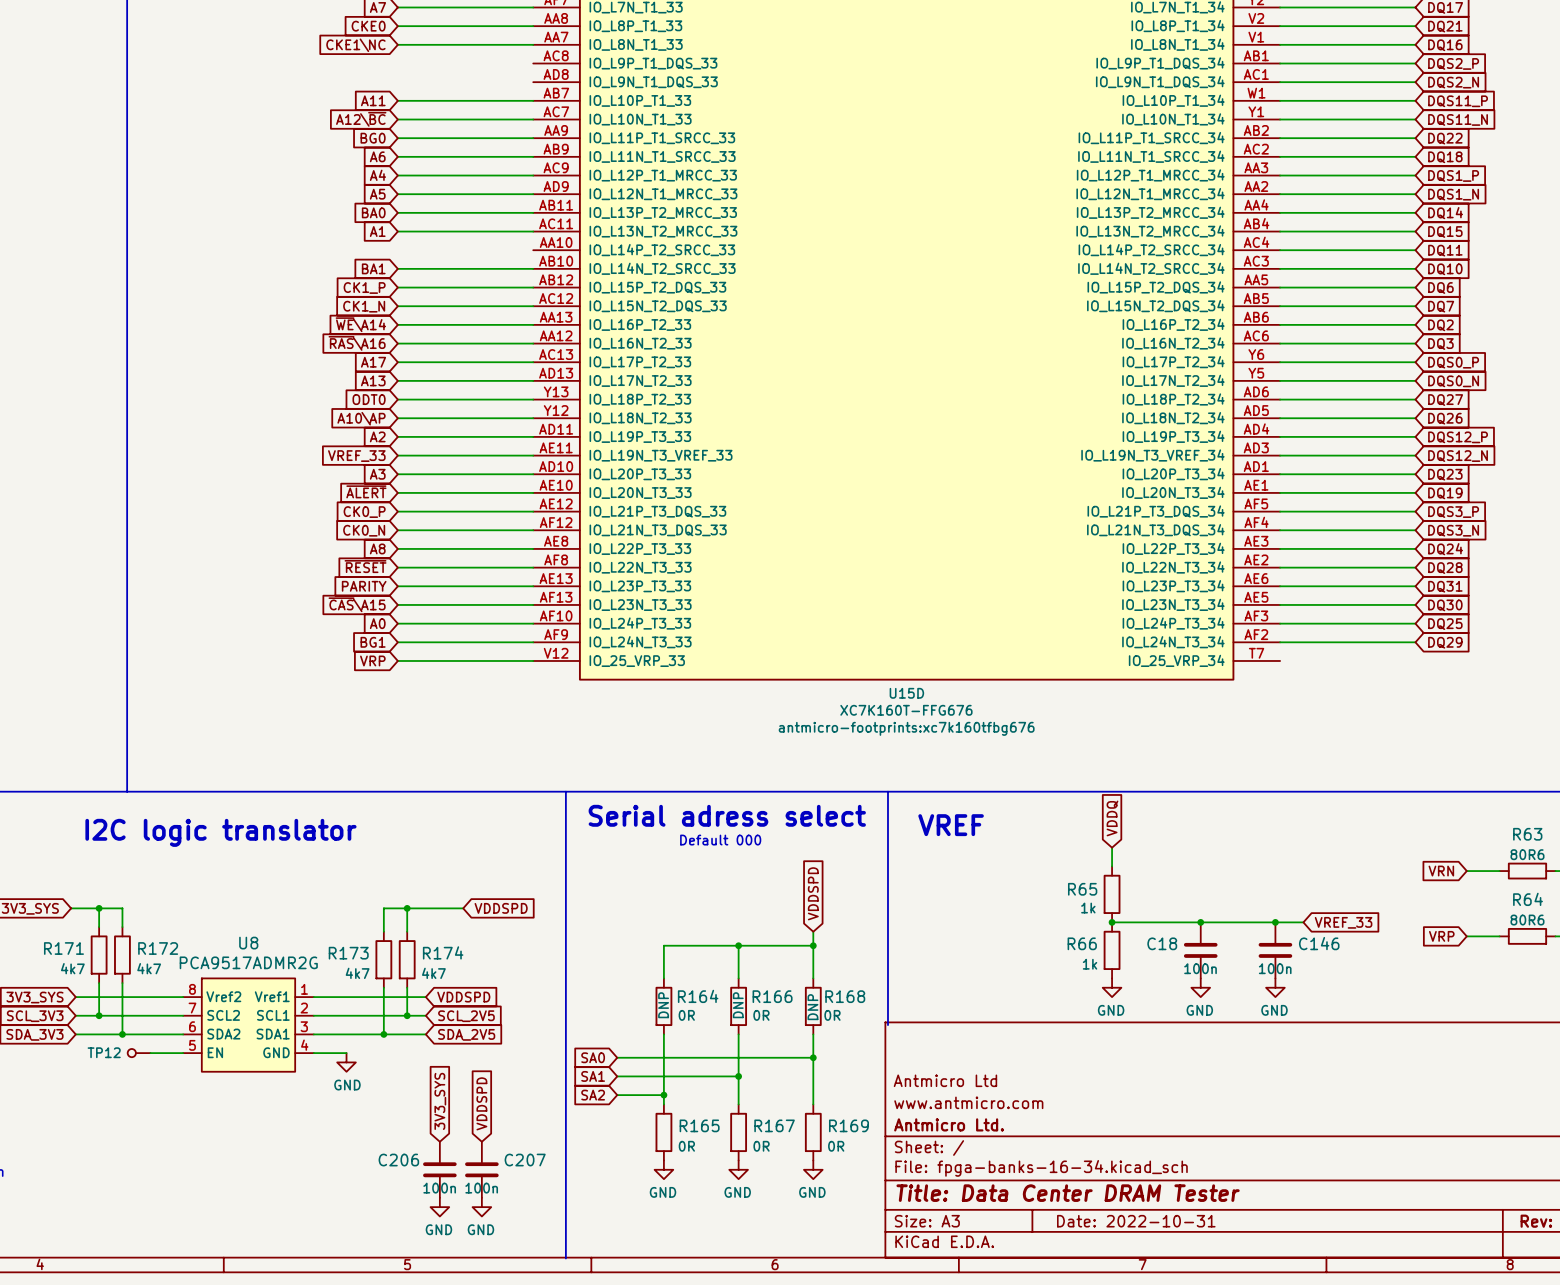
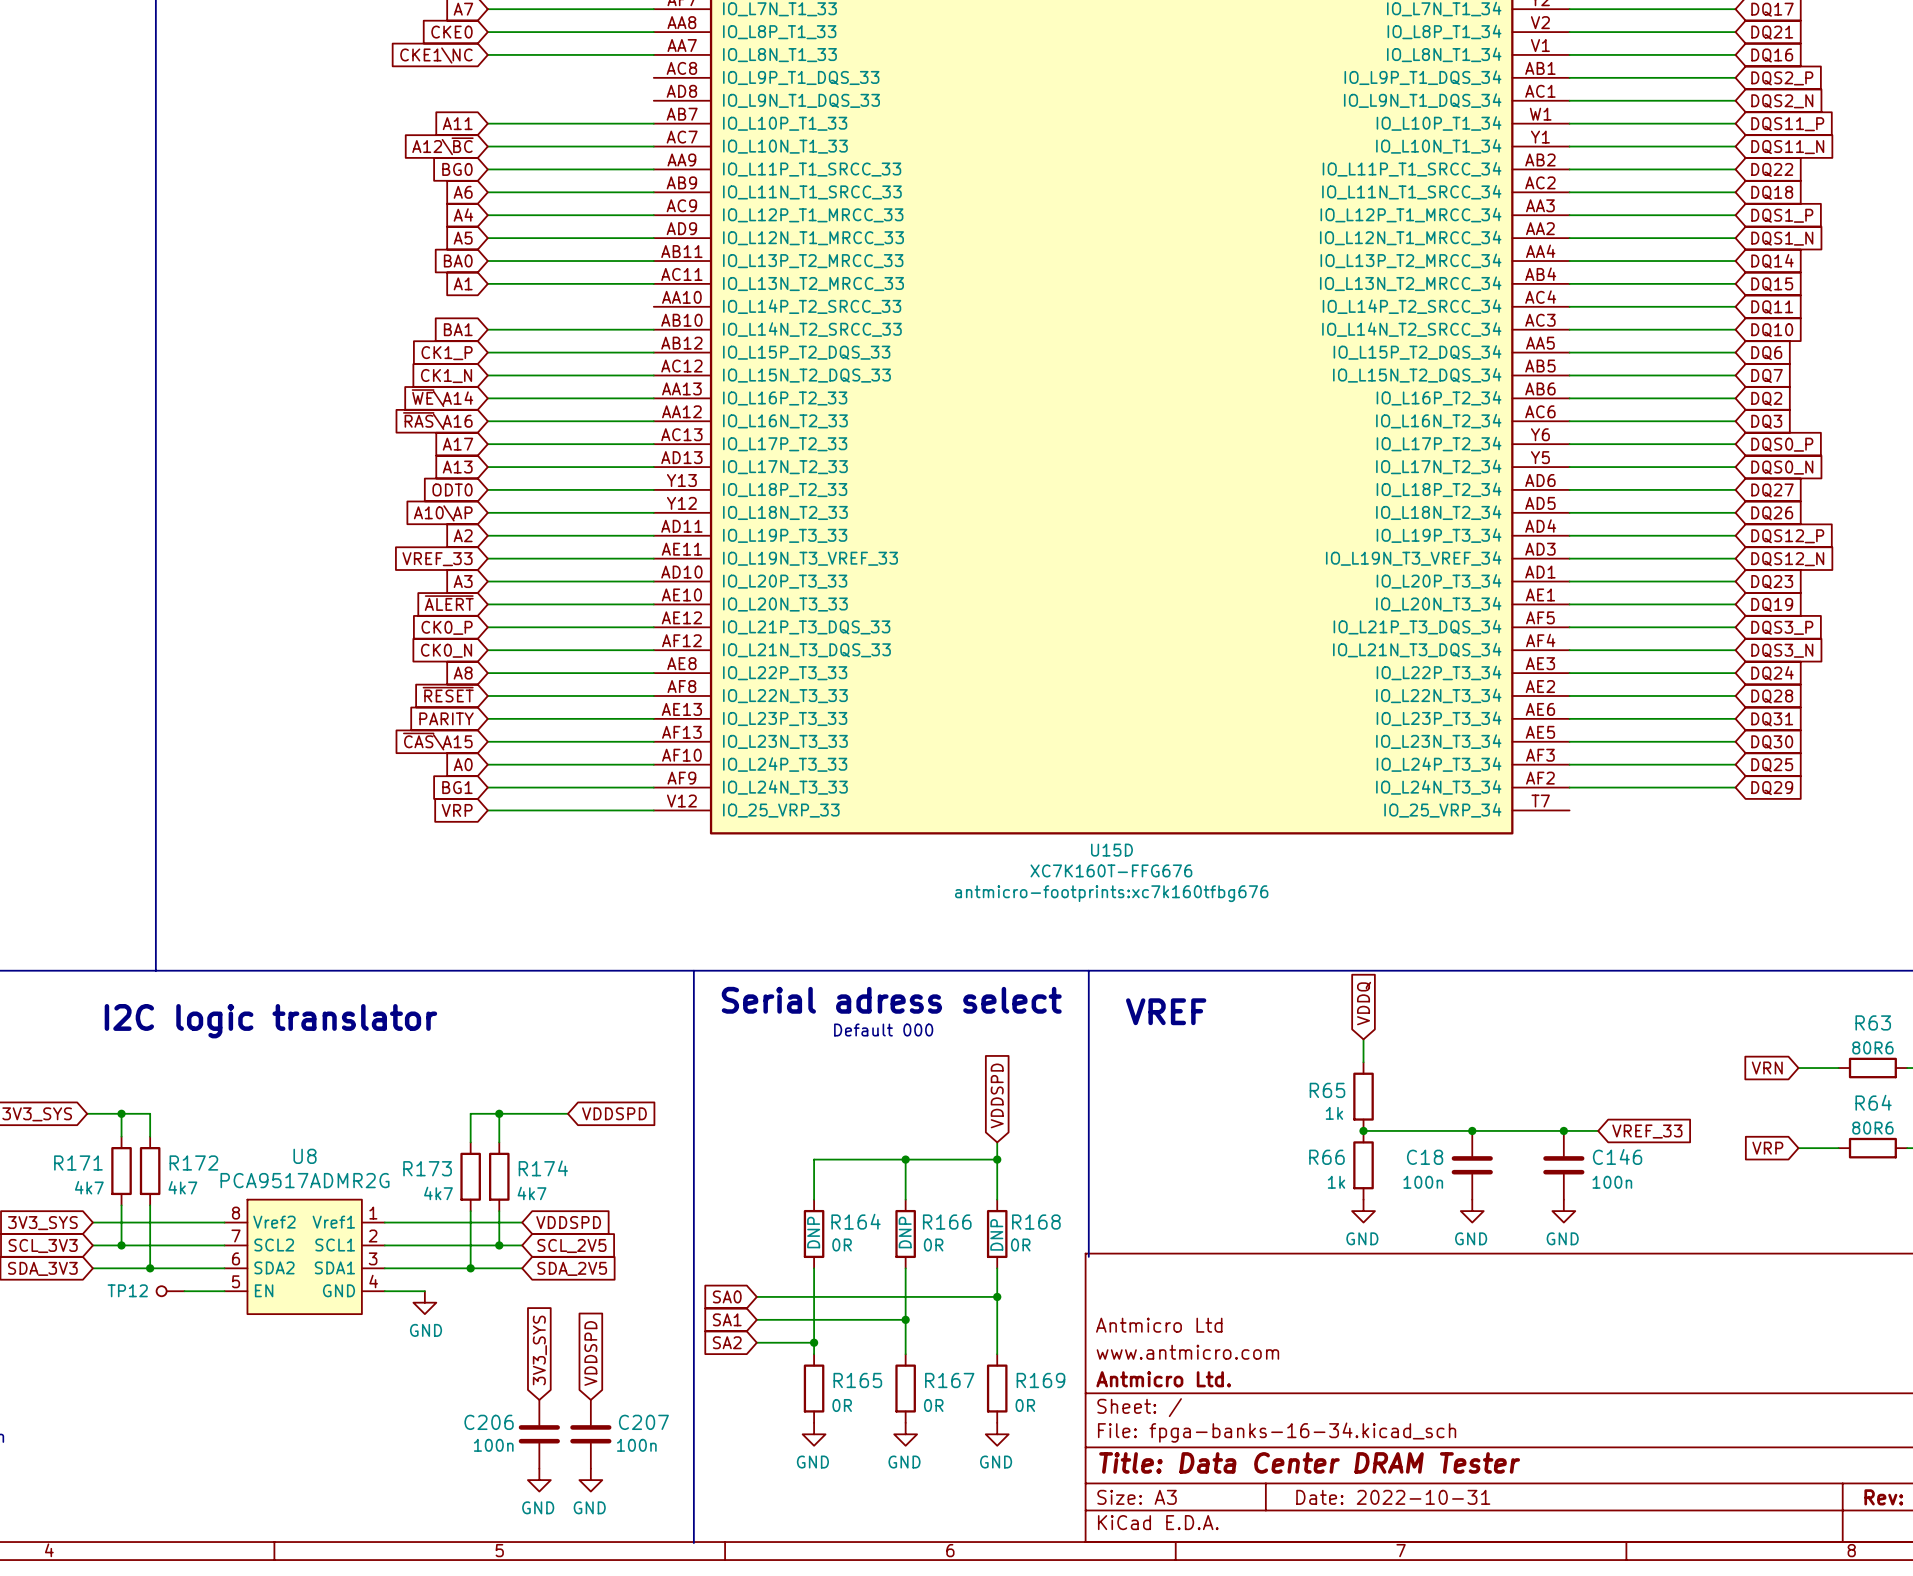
C18 text position: 100n (1200, 968) -> 100n (1423, 1182)
C146 text position: 100n (1275, 968) -> 100n (1612, 1182)
C206 text position: 100n (439, 1188) -> 100n (493, 1445)
C207 text position: 100n (481, 1188) -> 100n (636, 1445)

